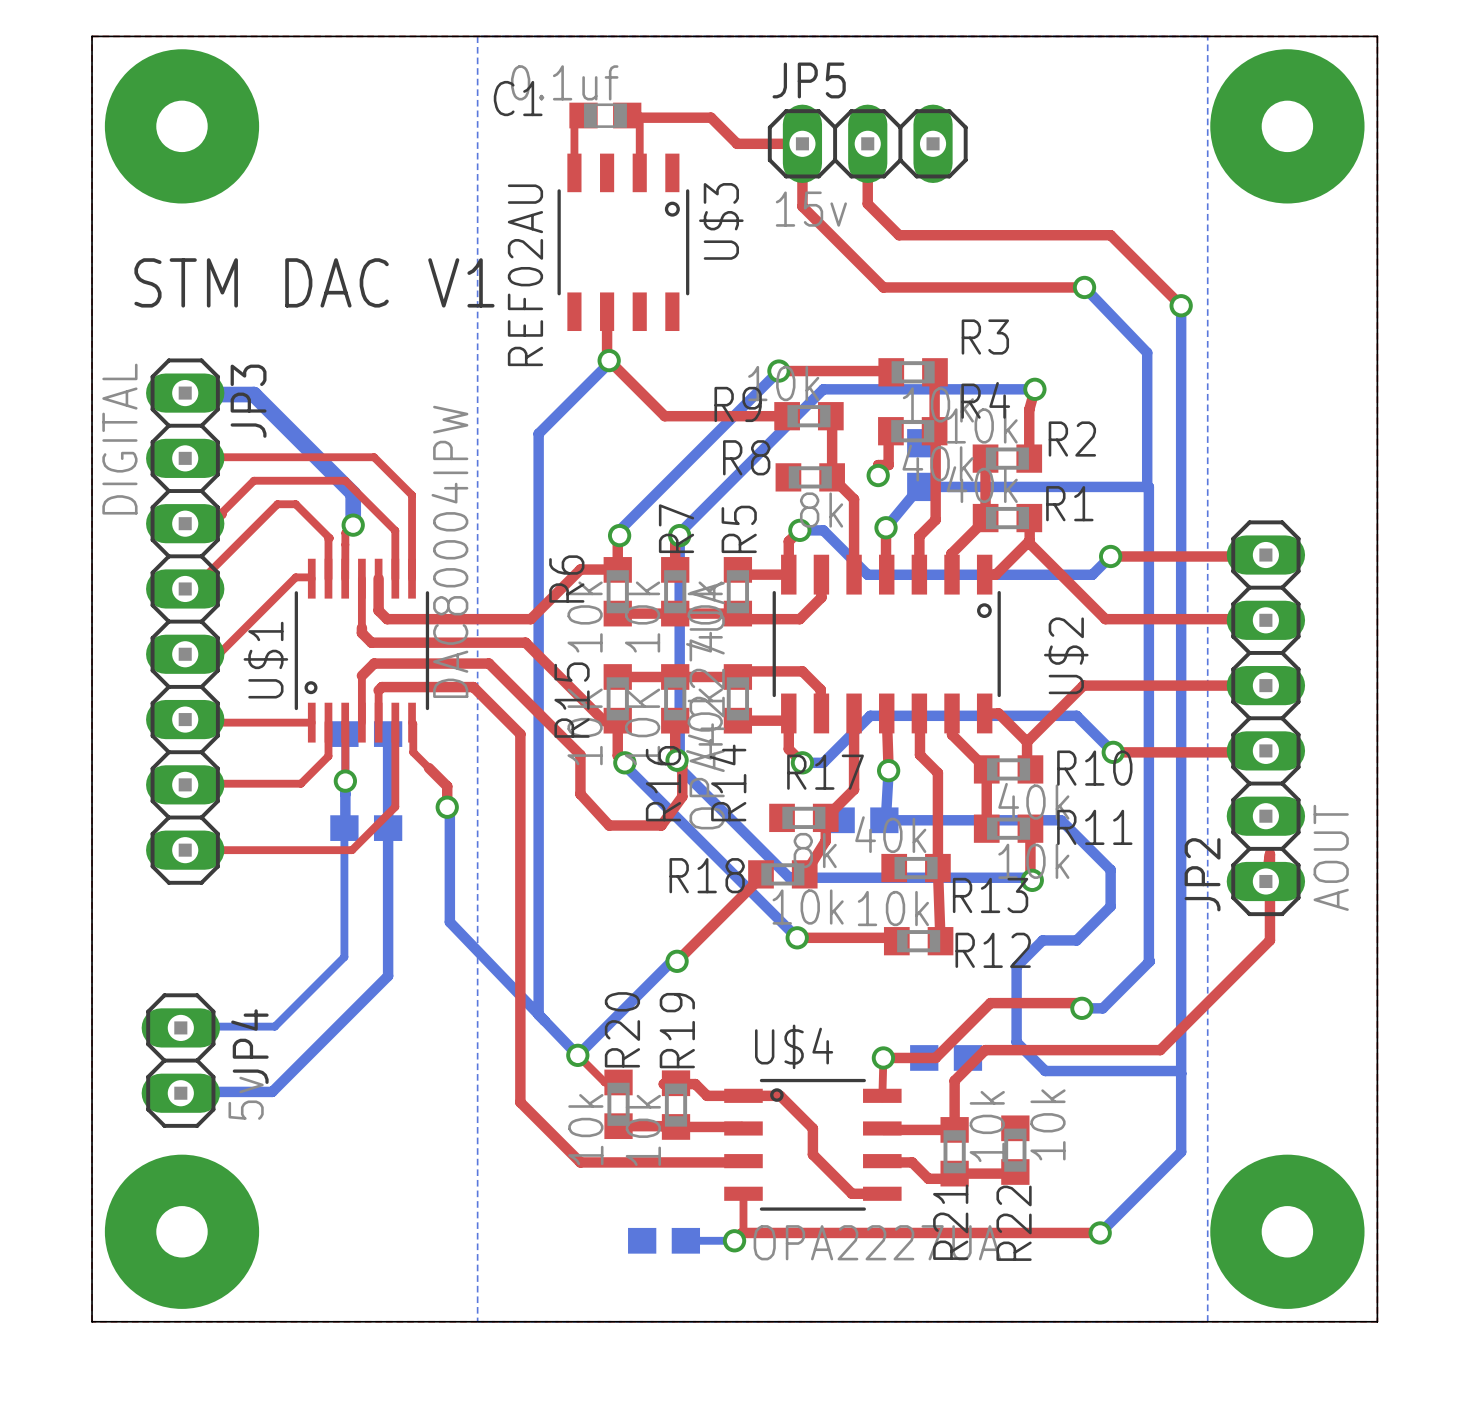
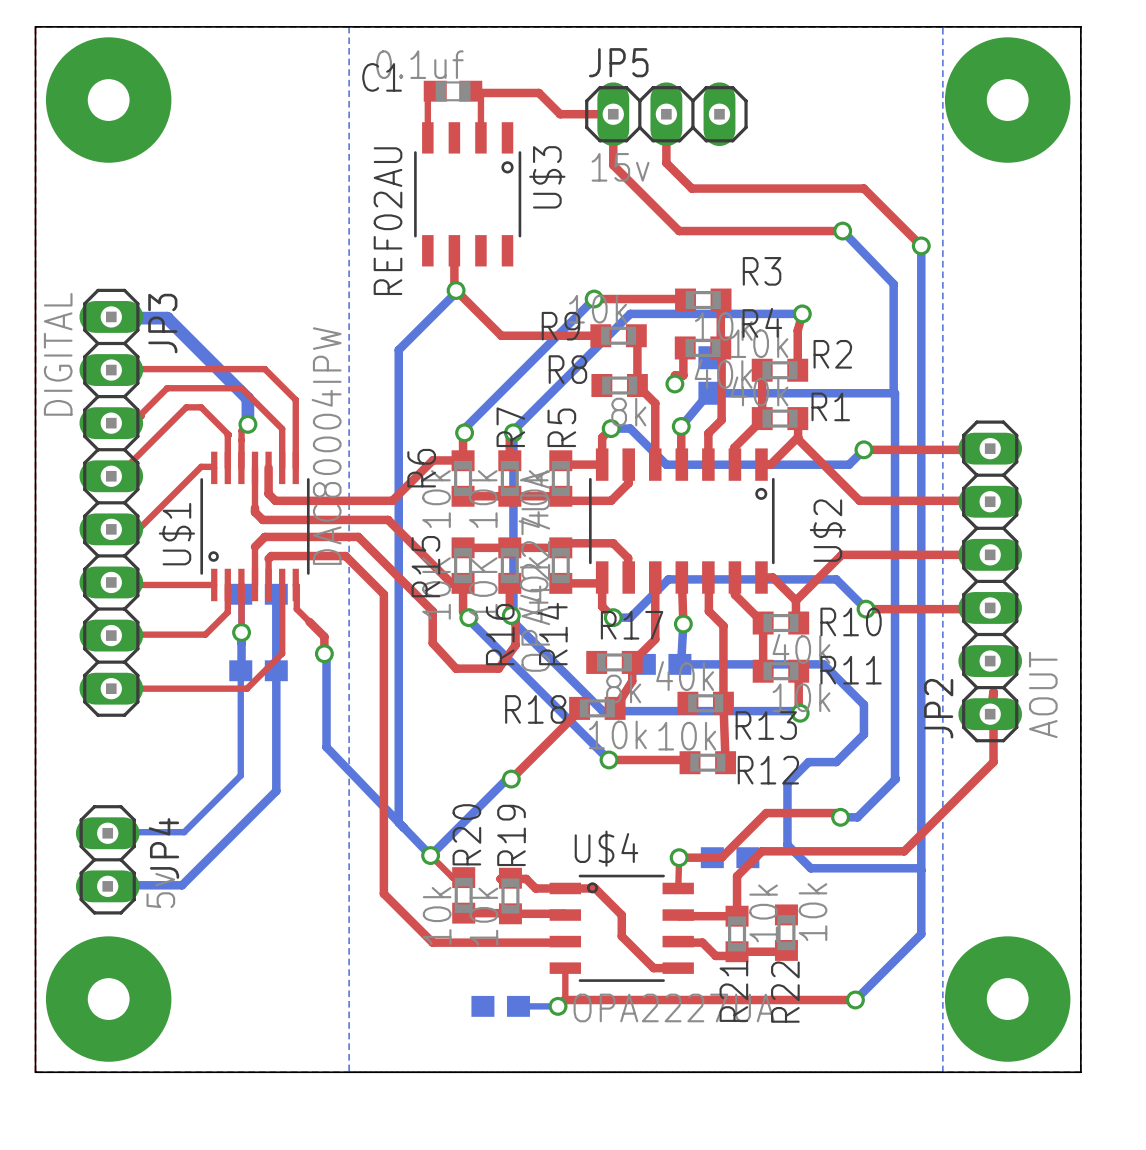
text: STM DAC V1 (314, 282) -> none

